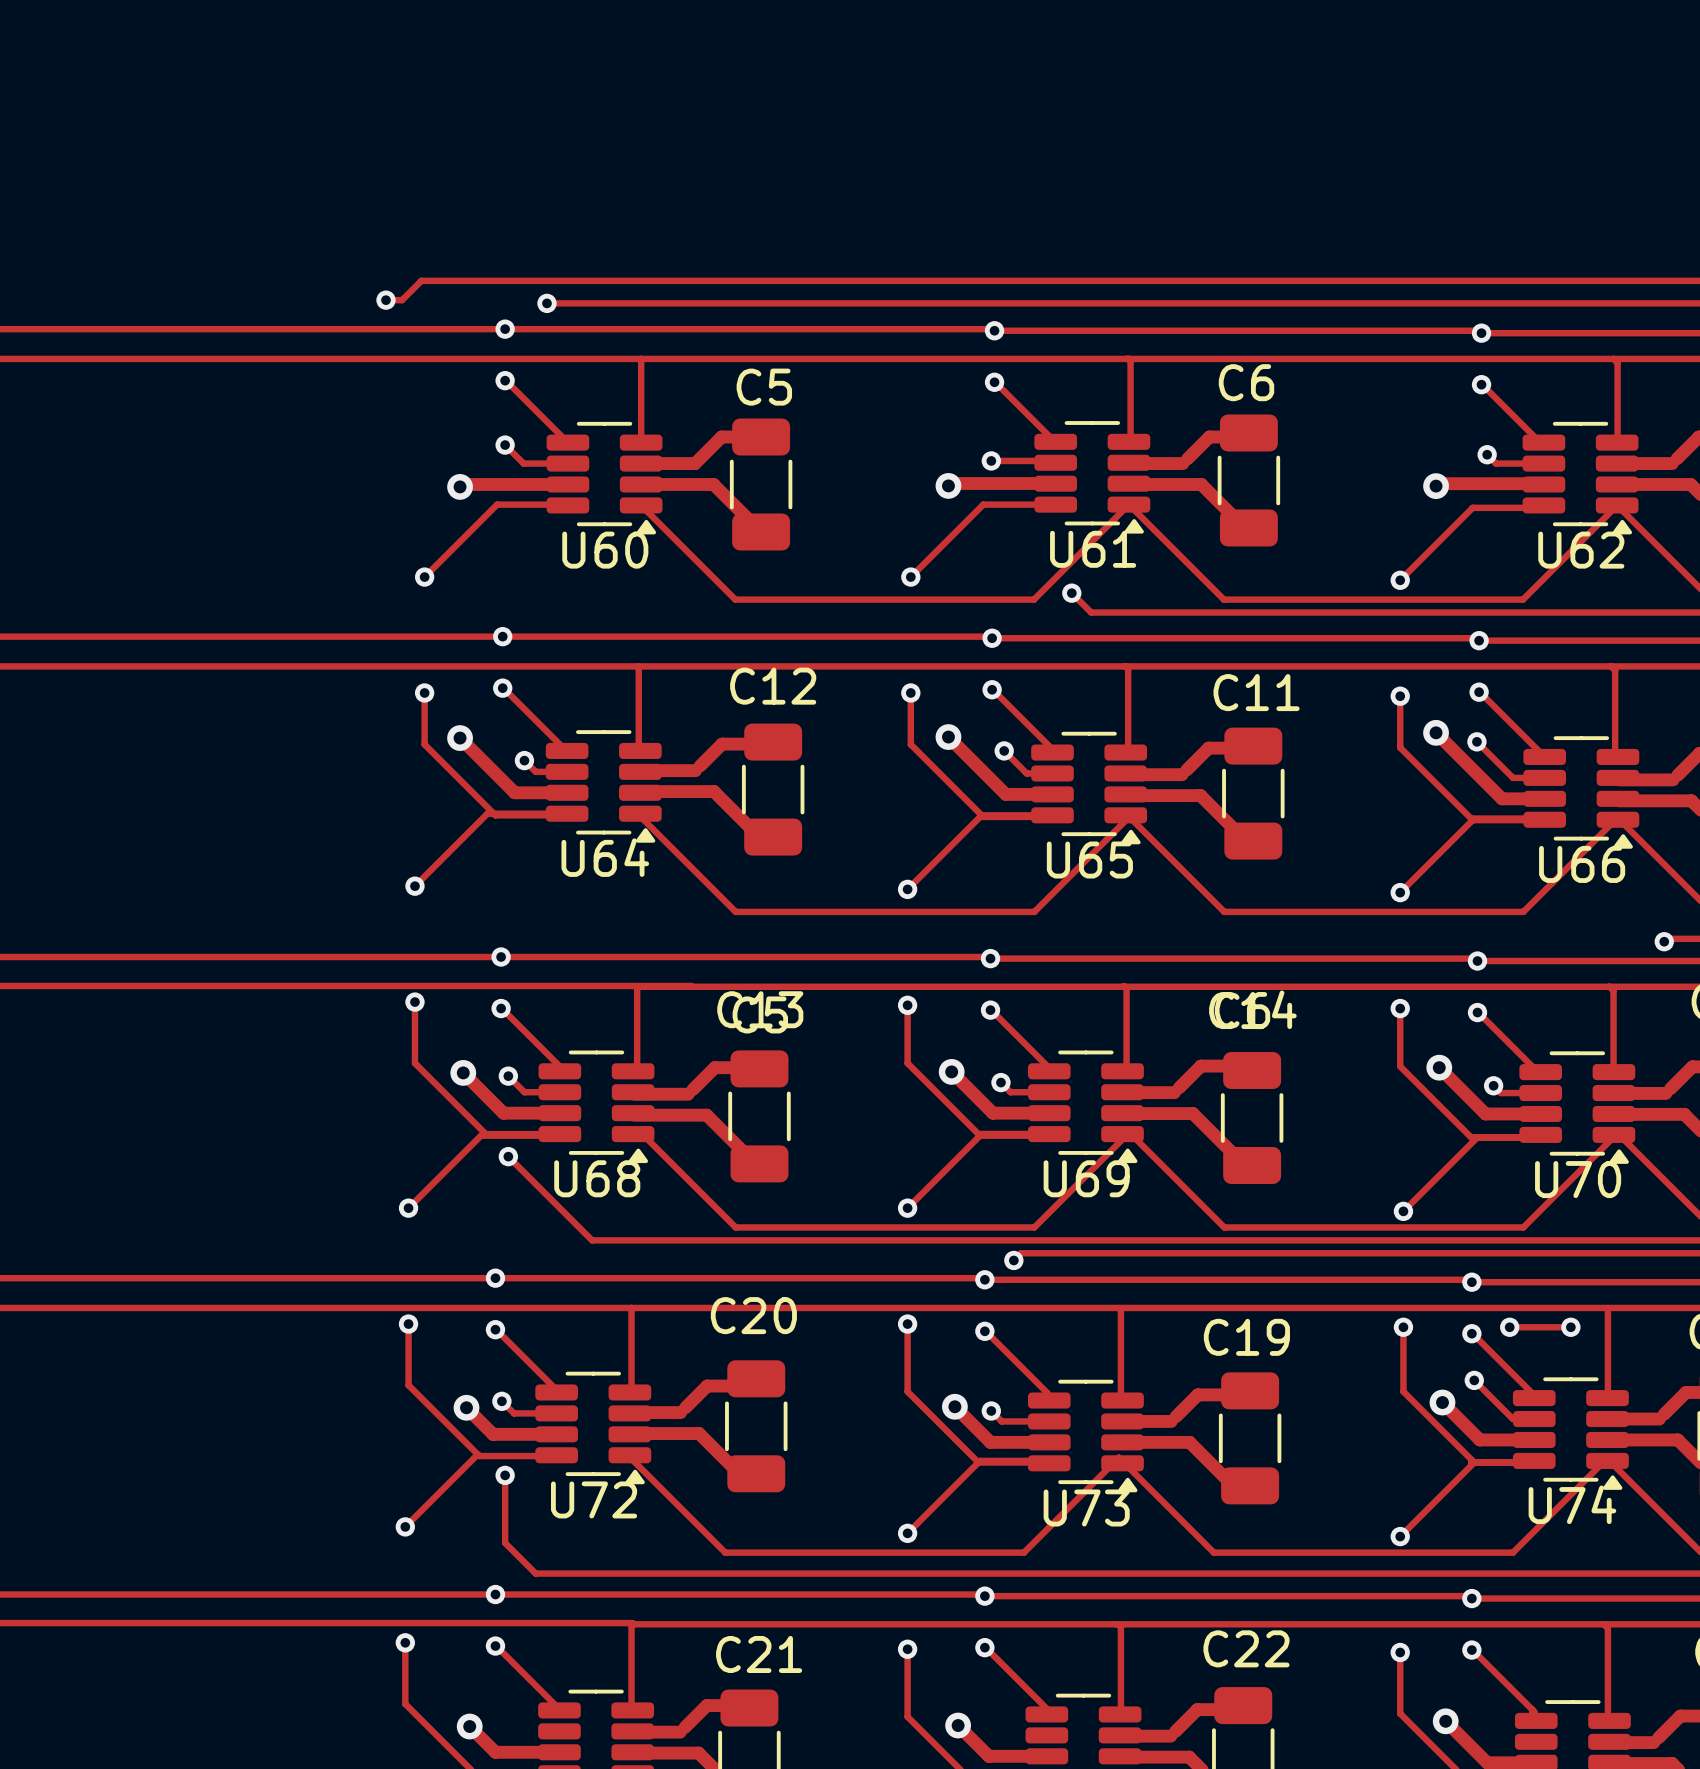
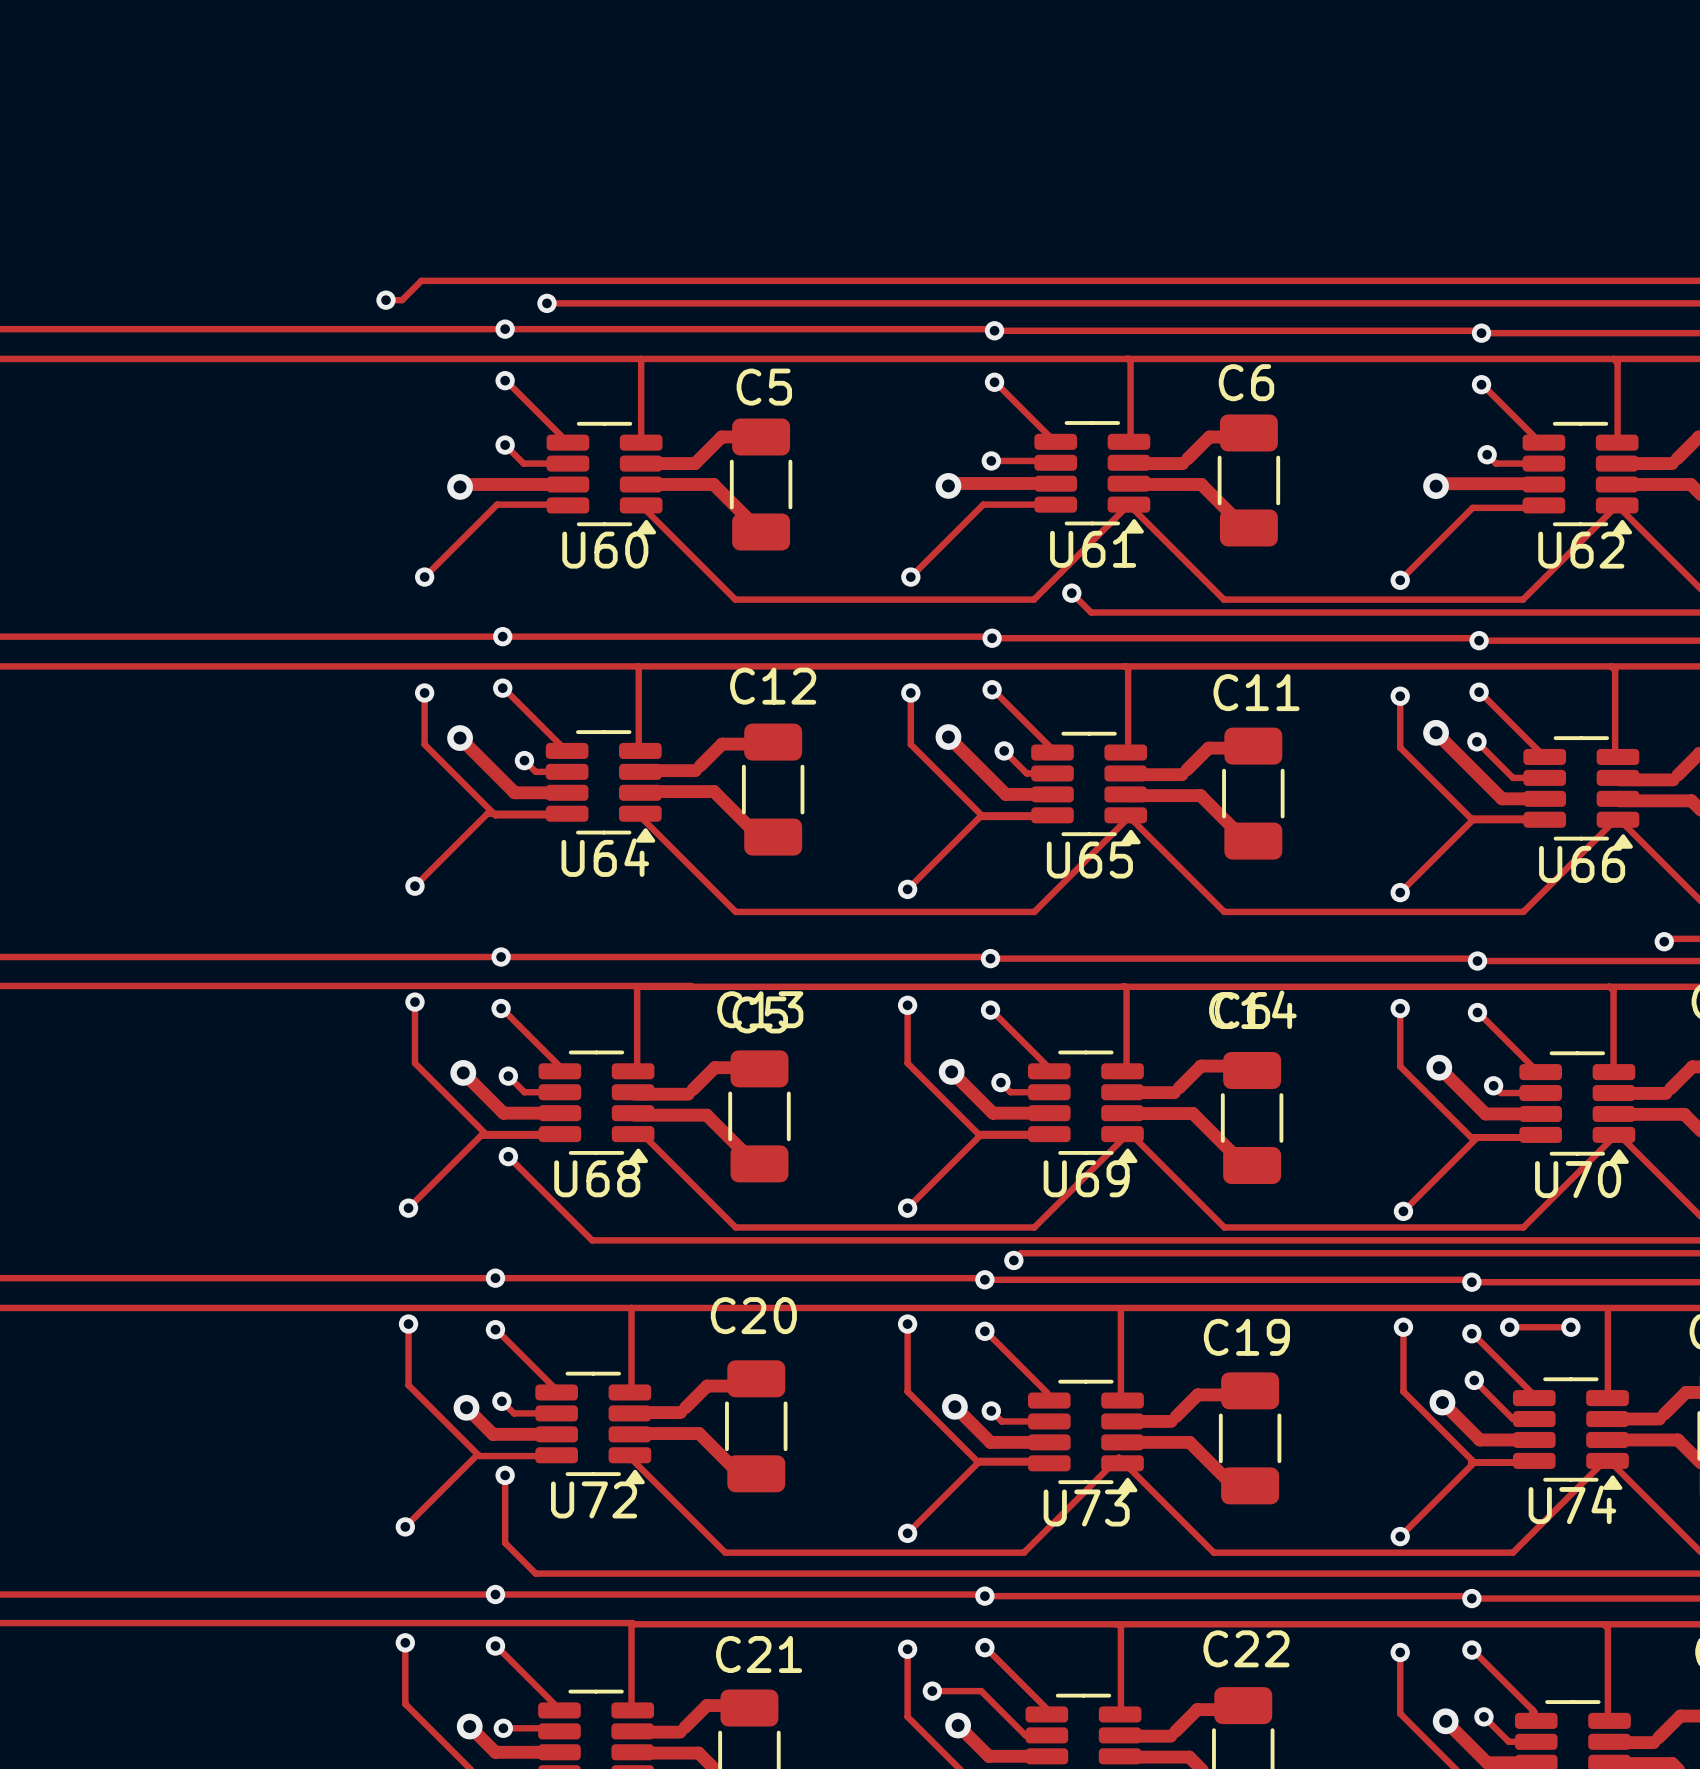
track: none -> (932, 1691) (981, 1691) (1025, 1735) (1046, 1735)
via: none -> (932, 1691)
track: none -> (1483, 1716) (1508, 1741) (1536, 1741)
via: none -> (1483, 1716)
track: none -> (503, 1728) (556, 1728) (559, 1731)
via: none -> (503, 1728)

